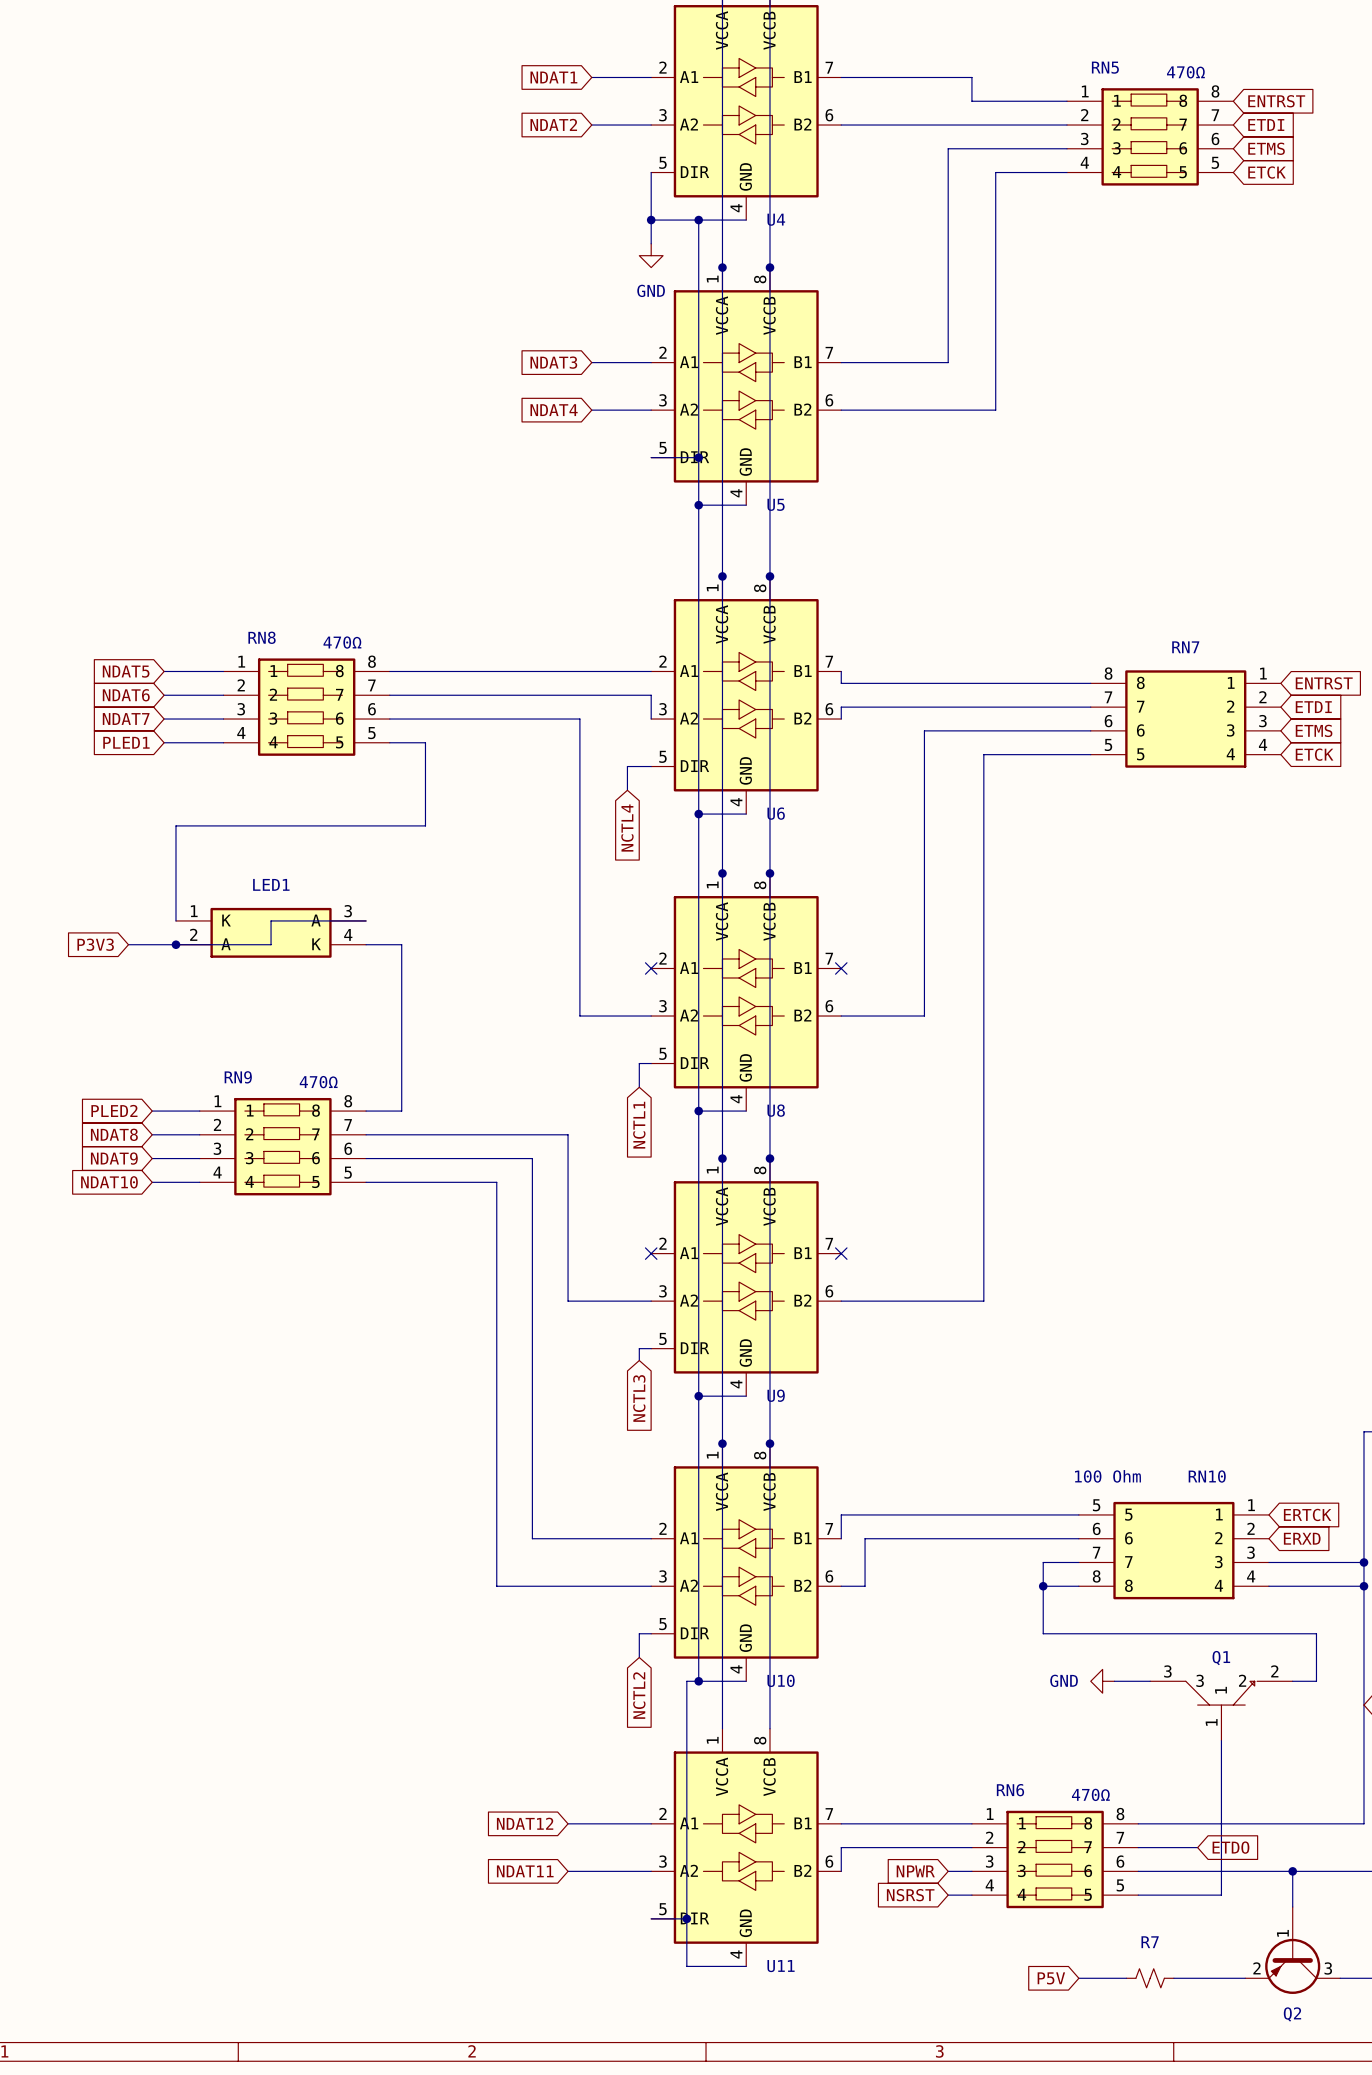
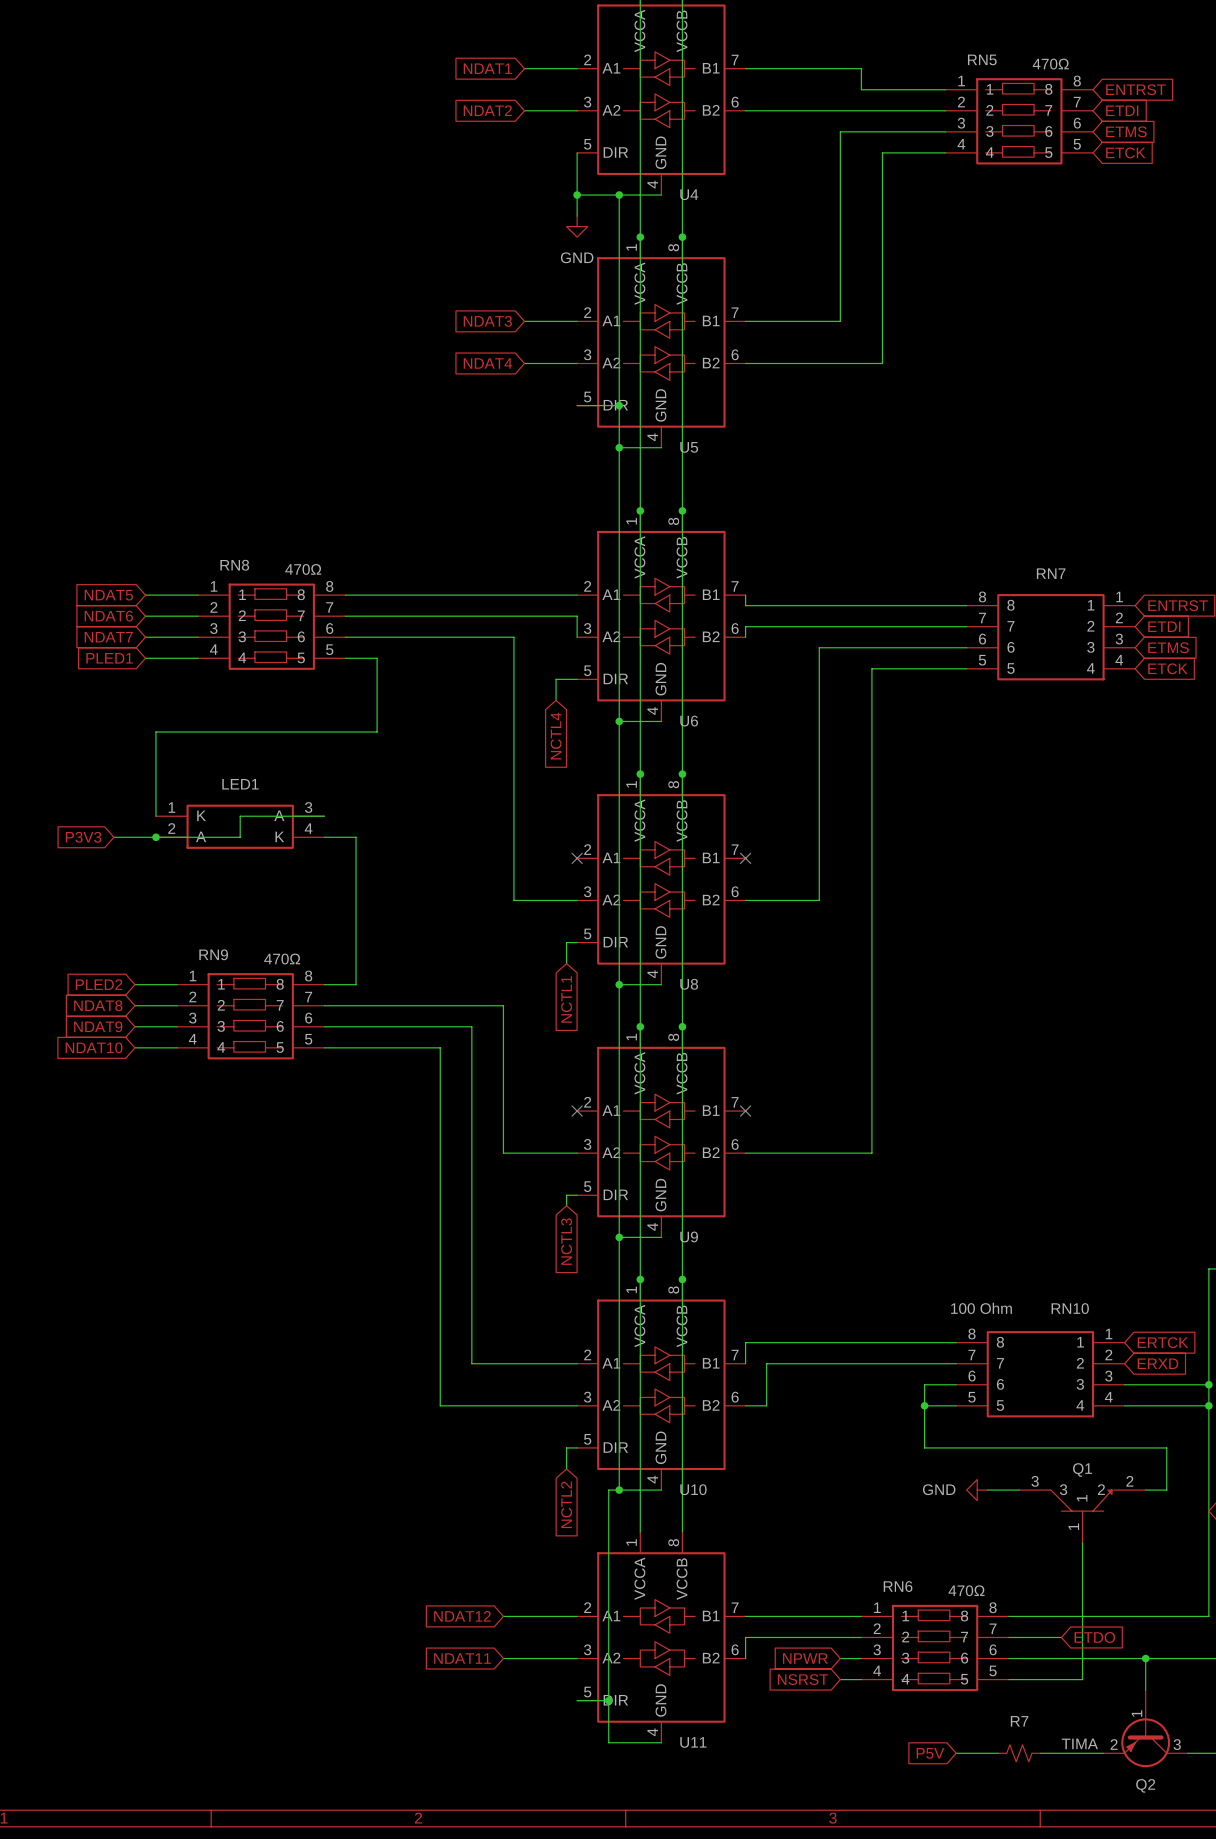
RN10 pin number: 5 (1096, 1505) -> 8 (971, 1333)
RN10 pin name: 5 (1128, 1514) -> 8 (1000, 1342)
RN10 pin number: 6 (1096, 1528) -> 7 (971, 1355)
RN10 pin name: 6 (1128, 1538) -> 7 (1000, 1363)
RN10 pin number: 7 (1096, 1552) -> 6 (972, 1376)
RN10 pin name: 7 (1128, 1562) -> 6 (1000, 1384)
RN10 pin number: 8 (1096, 1576) -> 5 (971, 1397)
RN10 pin name: 8 (1128, 1585) -> 5 (1000, 1405)
label: none -> TIMA (1079, 1743)

